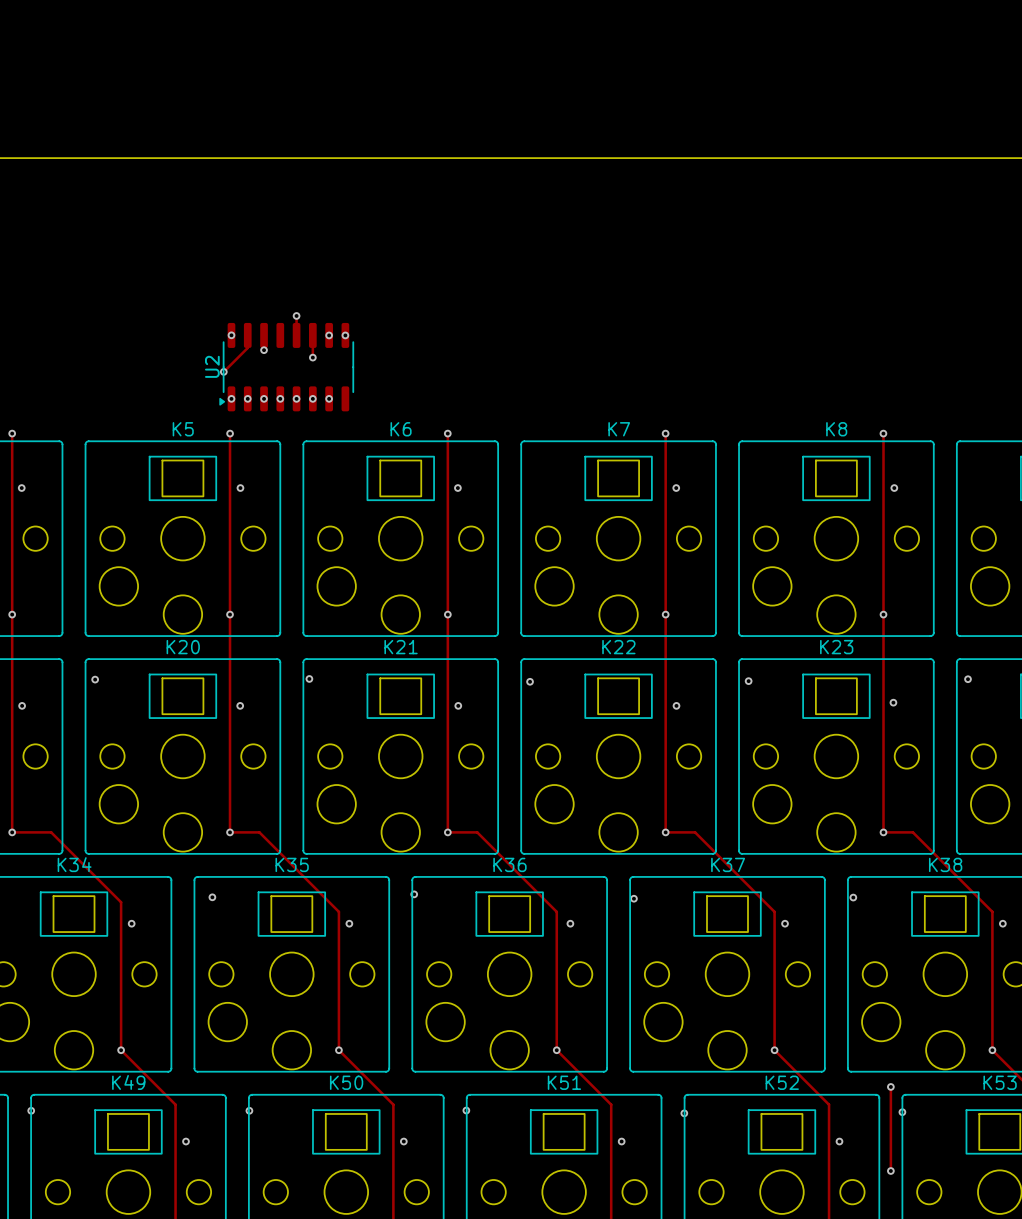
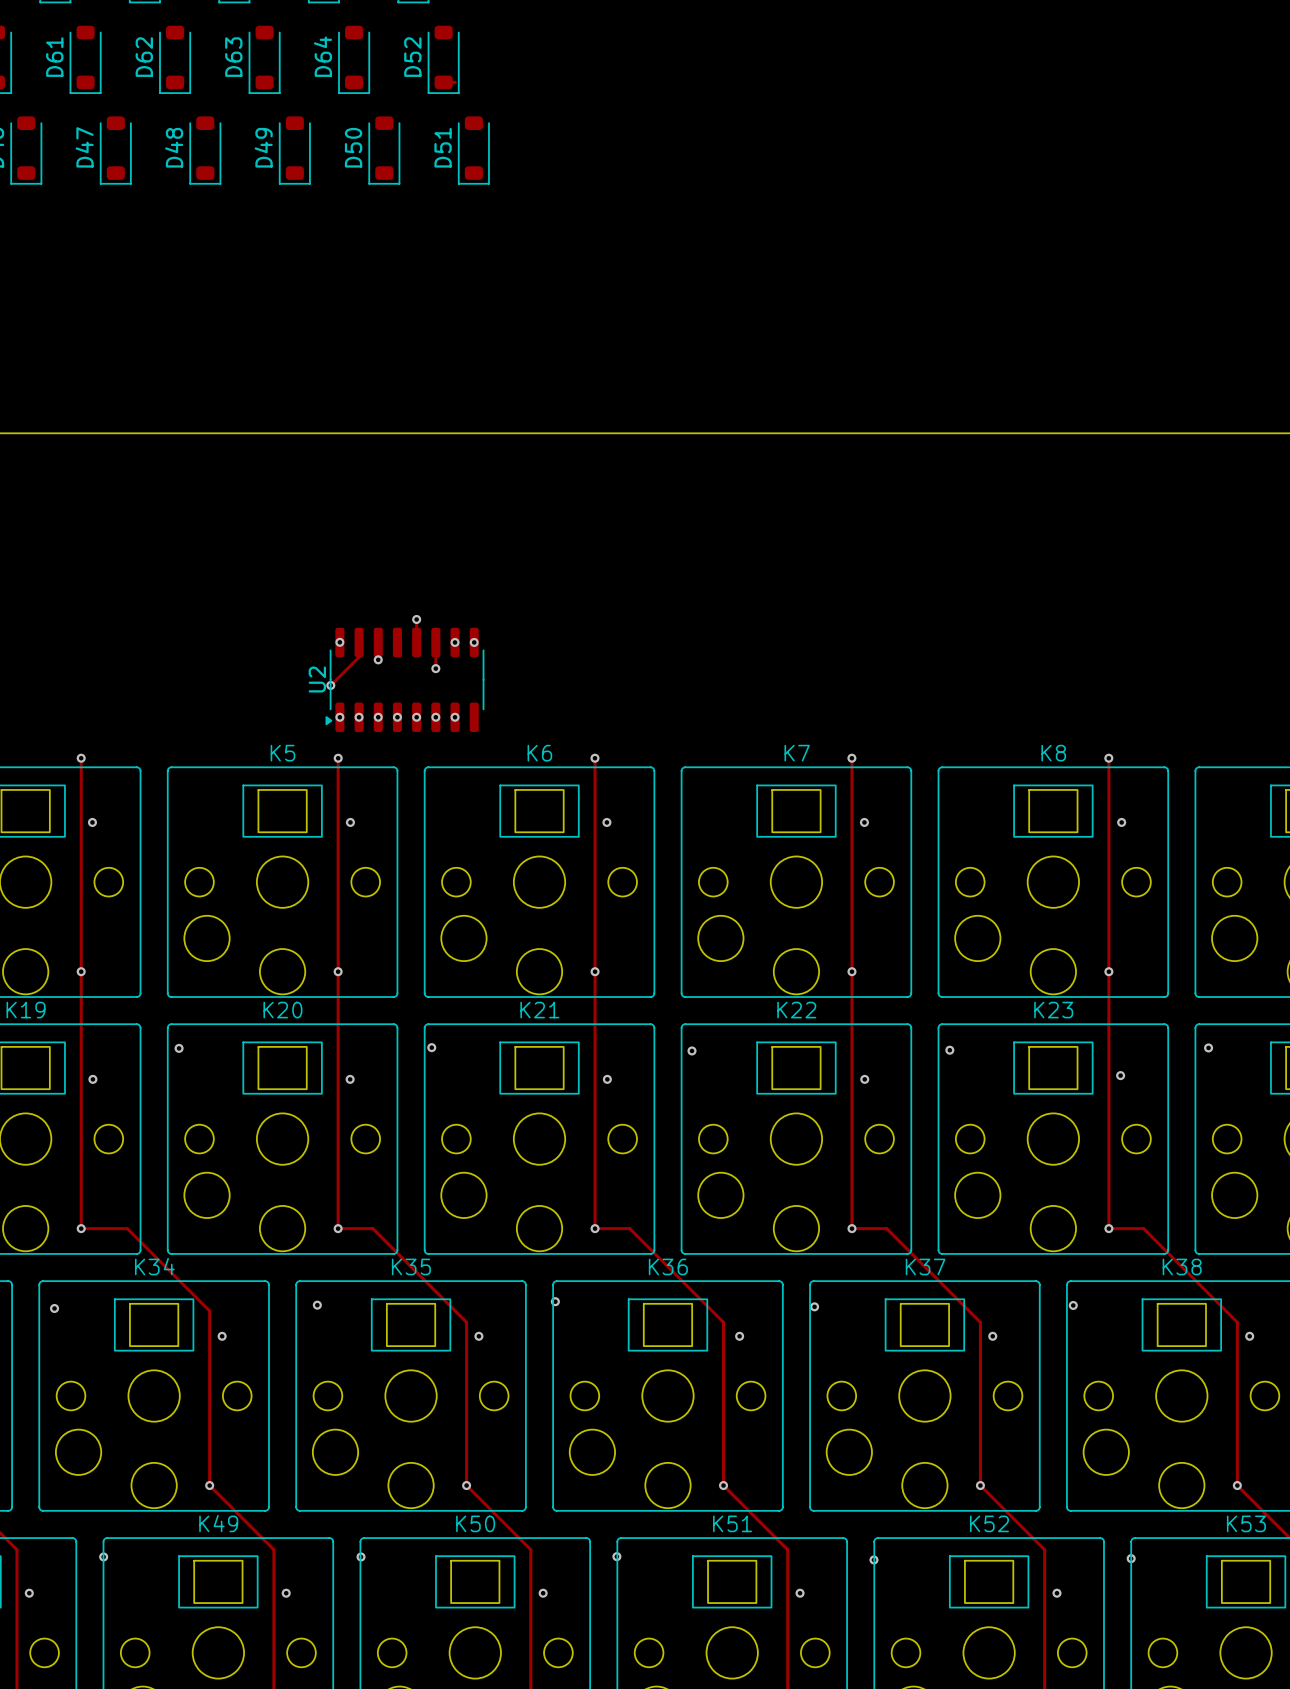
track: (890, 1086) (890, 1171) -> none
via: (890, 1086) -> none
via: (890, 1171) -> none

